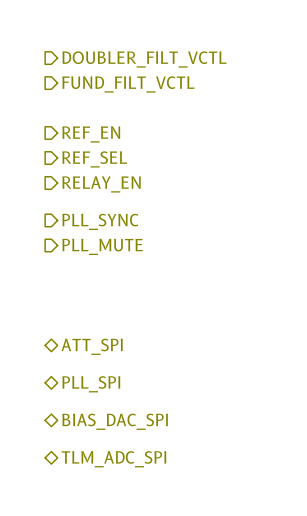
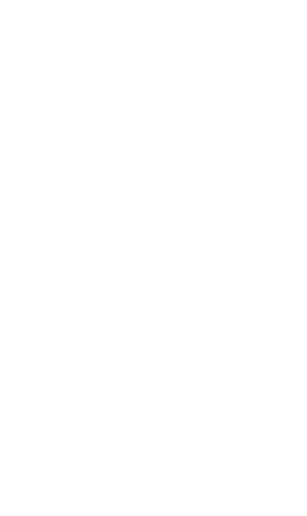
hierarchical label: DOUBLER_FILT_VCTL (144, 59) -> none
hierarchical label: FUND_FILT_VCTL (128, 84) -> none
hierarchical label: REF_EN (91, 134) -> none
hierarchical label: REF_SEL (94, 159) -> none
hierarchical label: RELAY_EN (101, 184) -> none
hierarchical label: PLL_SYNC (100, 221) -> none
hierarchical label: PLL_MUTE (102, 246) -> none
hierarchical label: ATT_SPI (92, 346) -> none
hierarchical label: PLL_SPI (91, 384) -> none
hierarchical label: BIAS_DAC_SPI (115, 421) -> none
hierarchical label: TLM_ADC_SPI (113, 459) -> none

